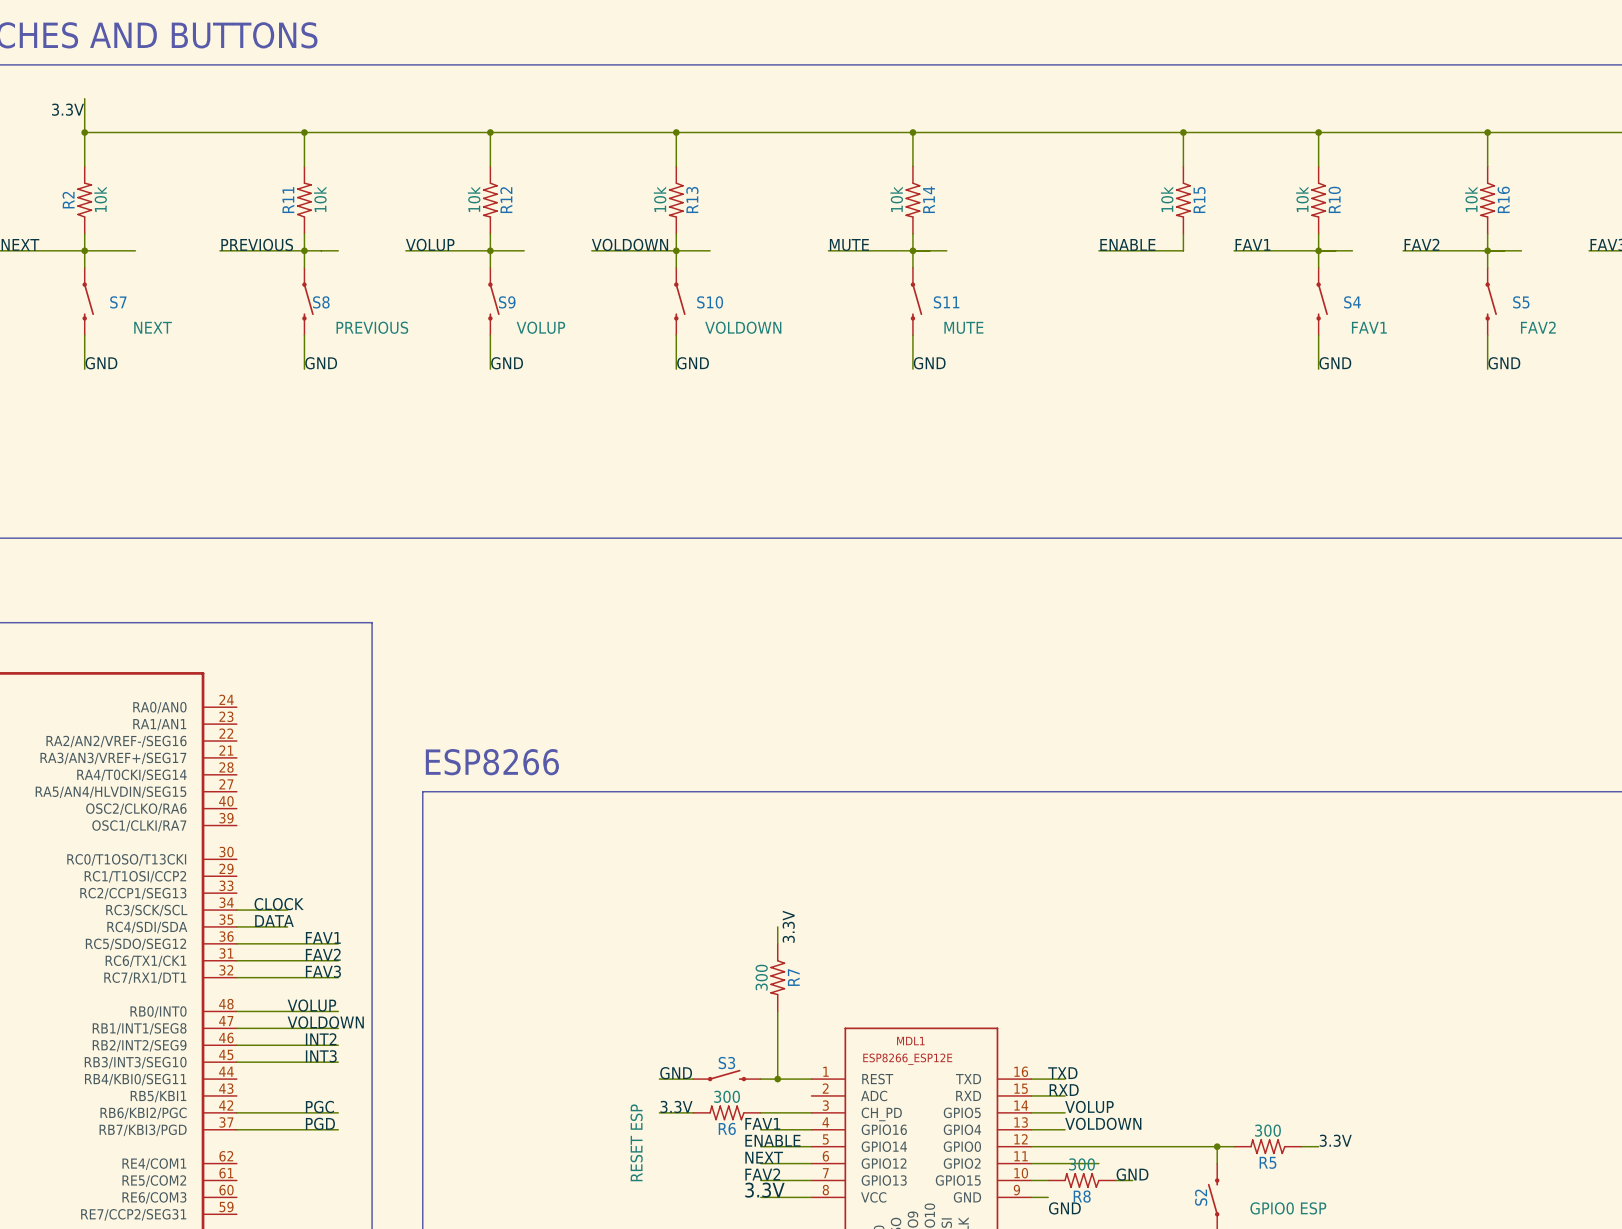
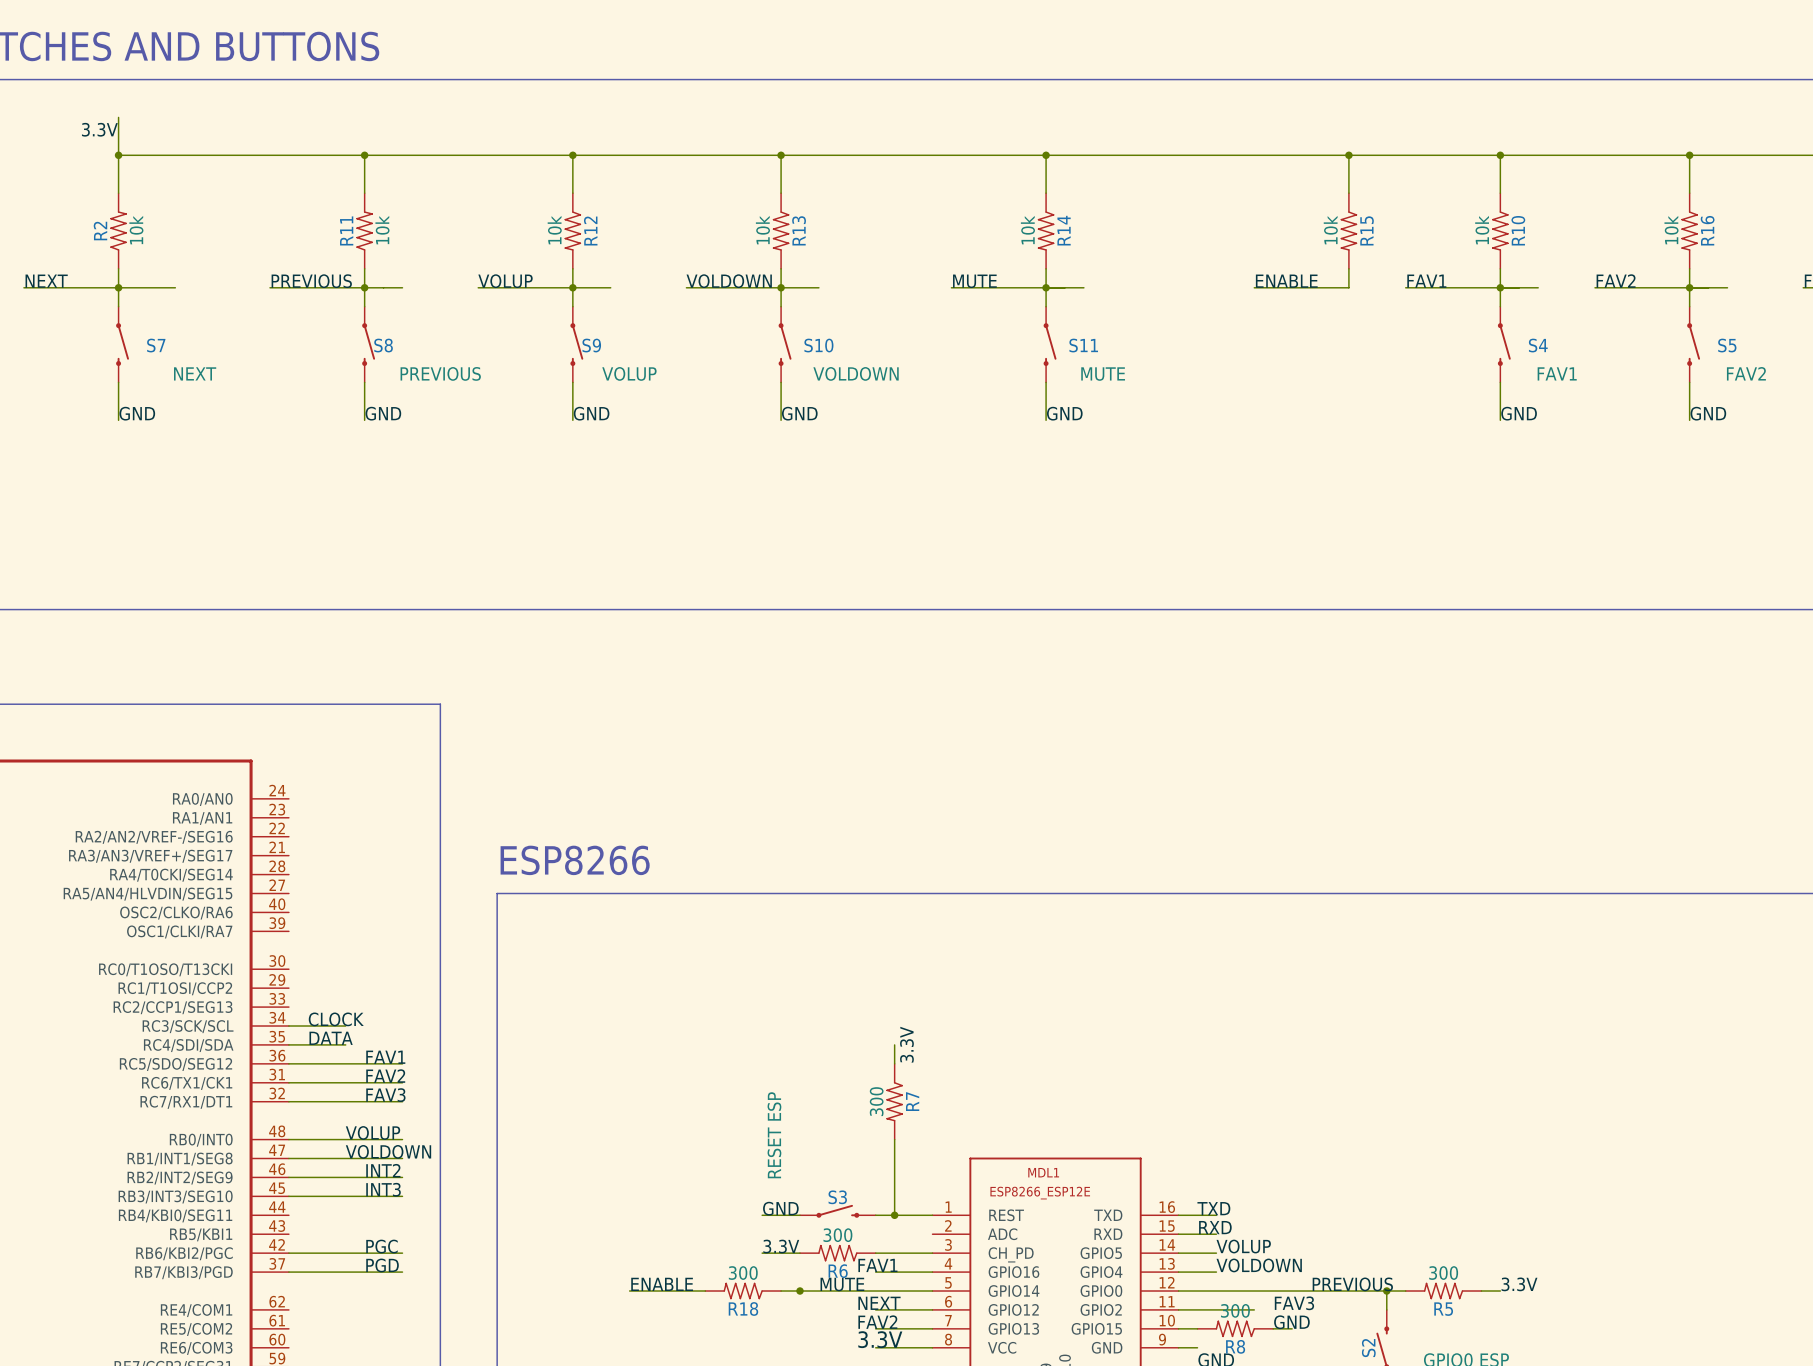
label: none -> ENABLE (662, 1284)
label: none -> MUTE (842, 1284)
label: ENABLE (772, 1140) -> none
label: none -> PREVIOUS (1352, 1284)
S3 value position: RESET ESP (636, 1142) -> RESET ESP (774, 1135)
wire: none -> (629, 1291) (705, 1291)
R18: none -> 300 (743, 1291)
wire: none -> (781, 1291) (875, 1291)
junction: none -> (800, 1291)
label: none -> FAV3 (1294, 1303)

